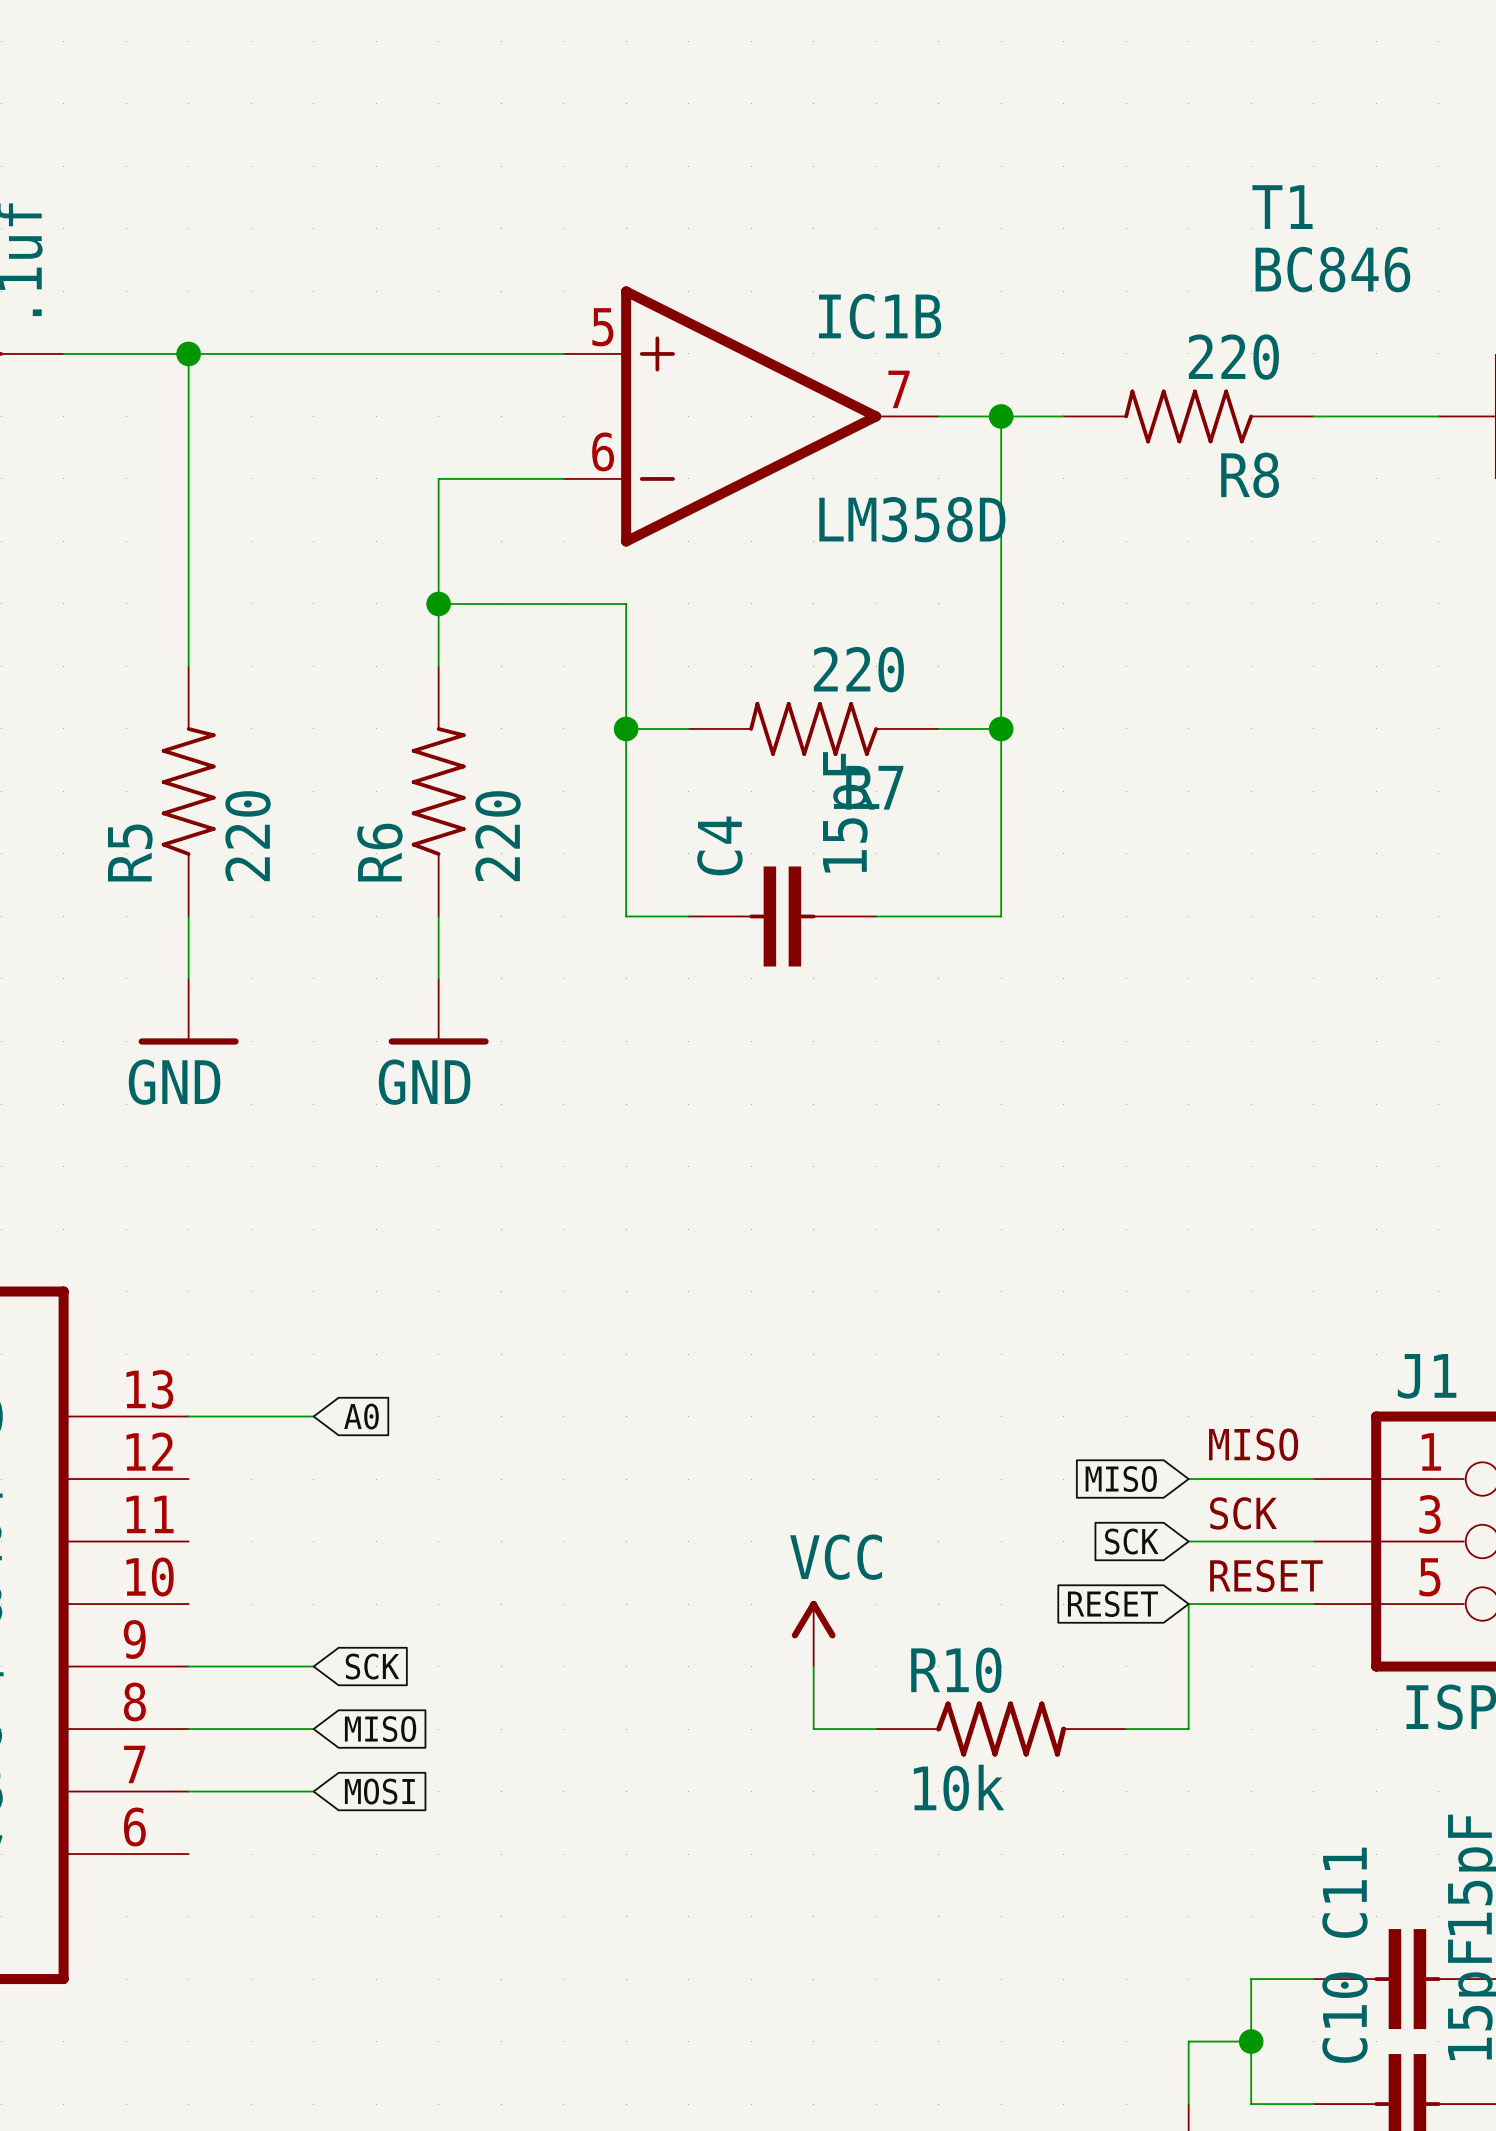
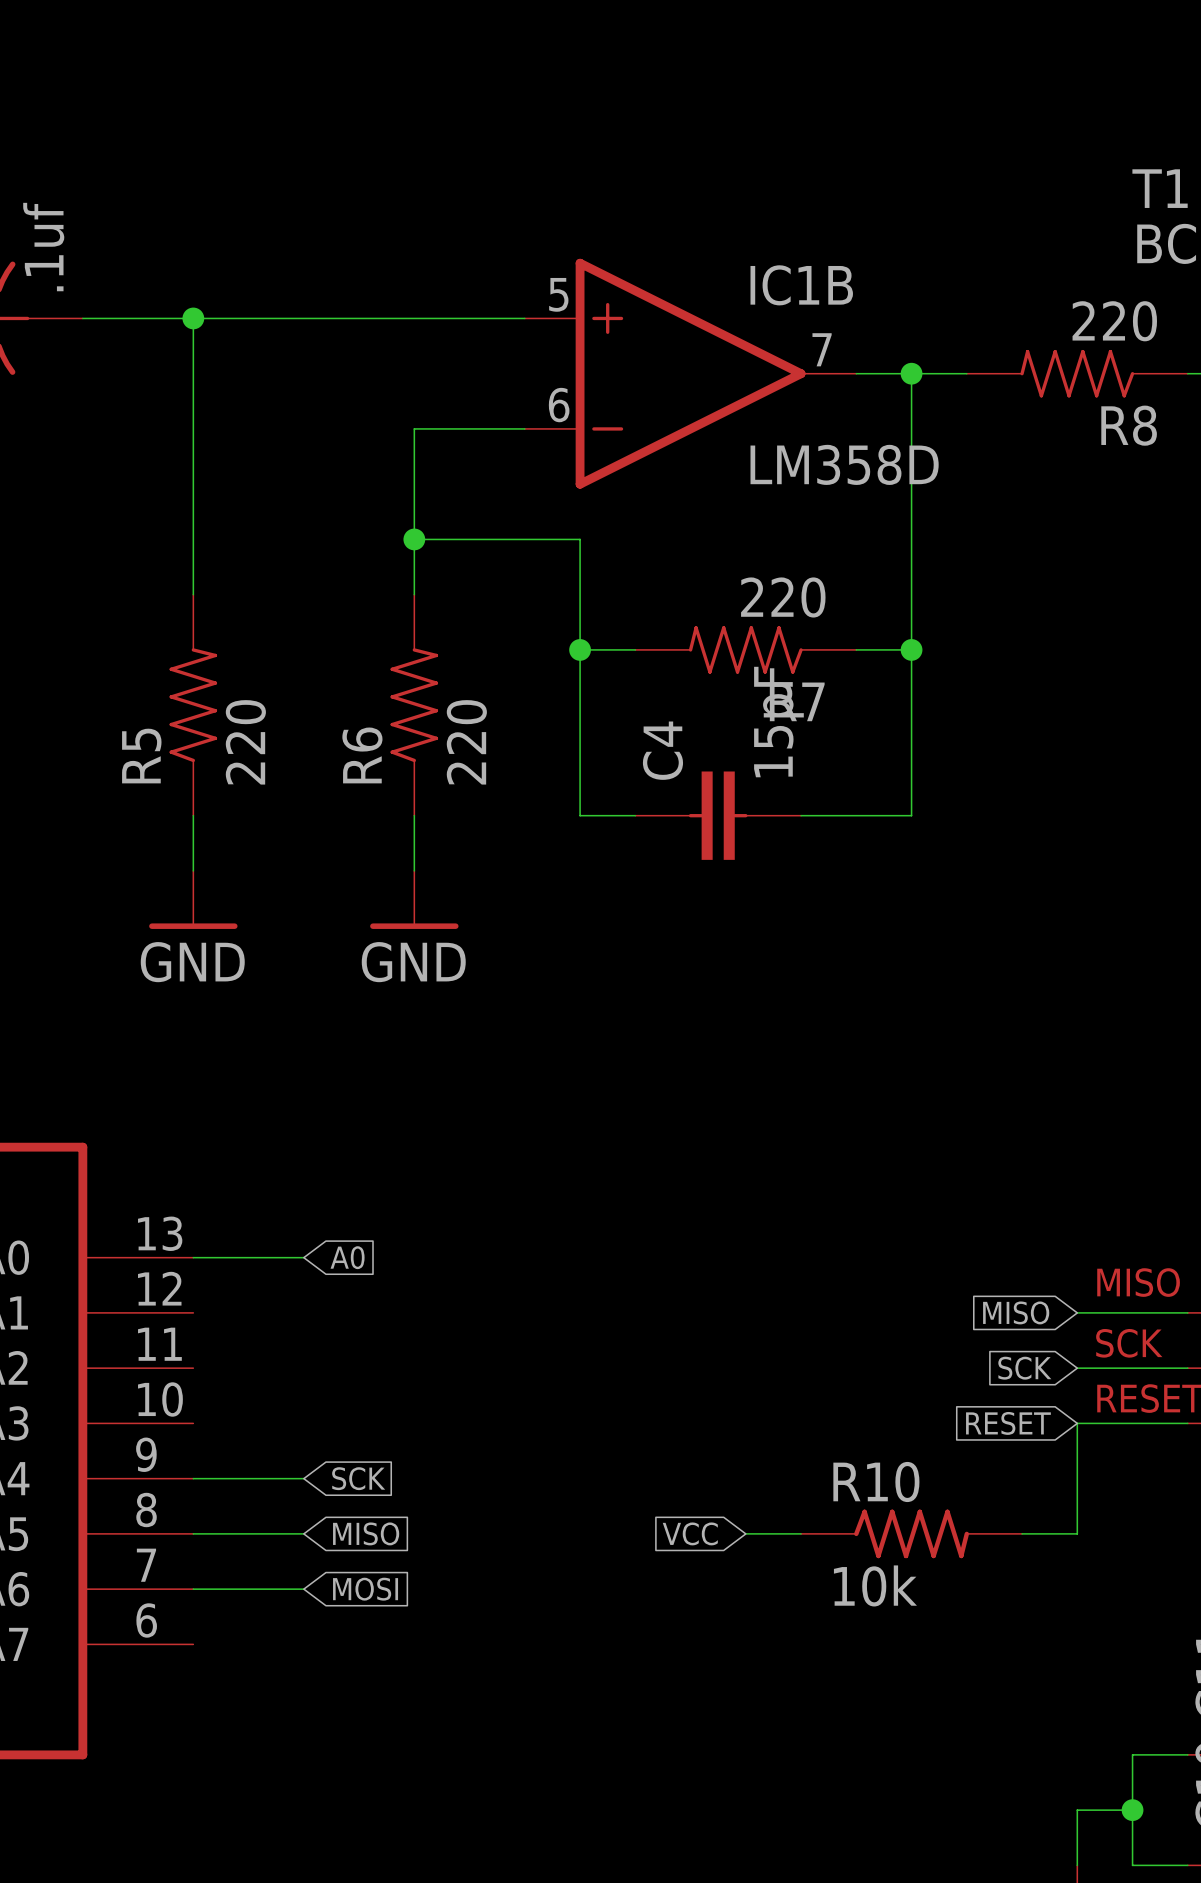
power symbol: VCC (813, 1633) -> none
wire: (813, 1666) (813, 1729) -> none
global label: none -> VCC (690, 1533)

